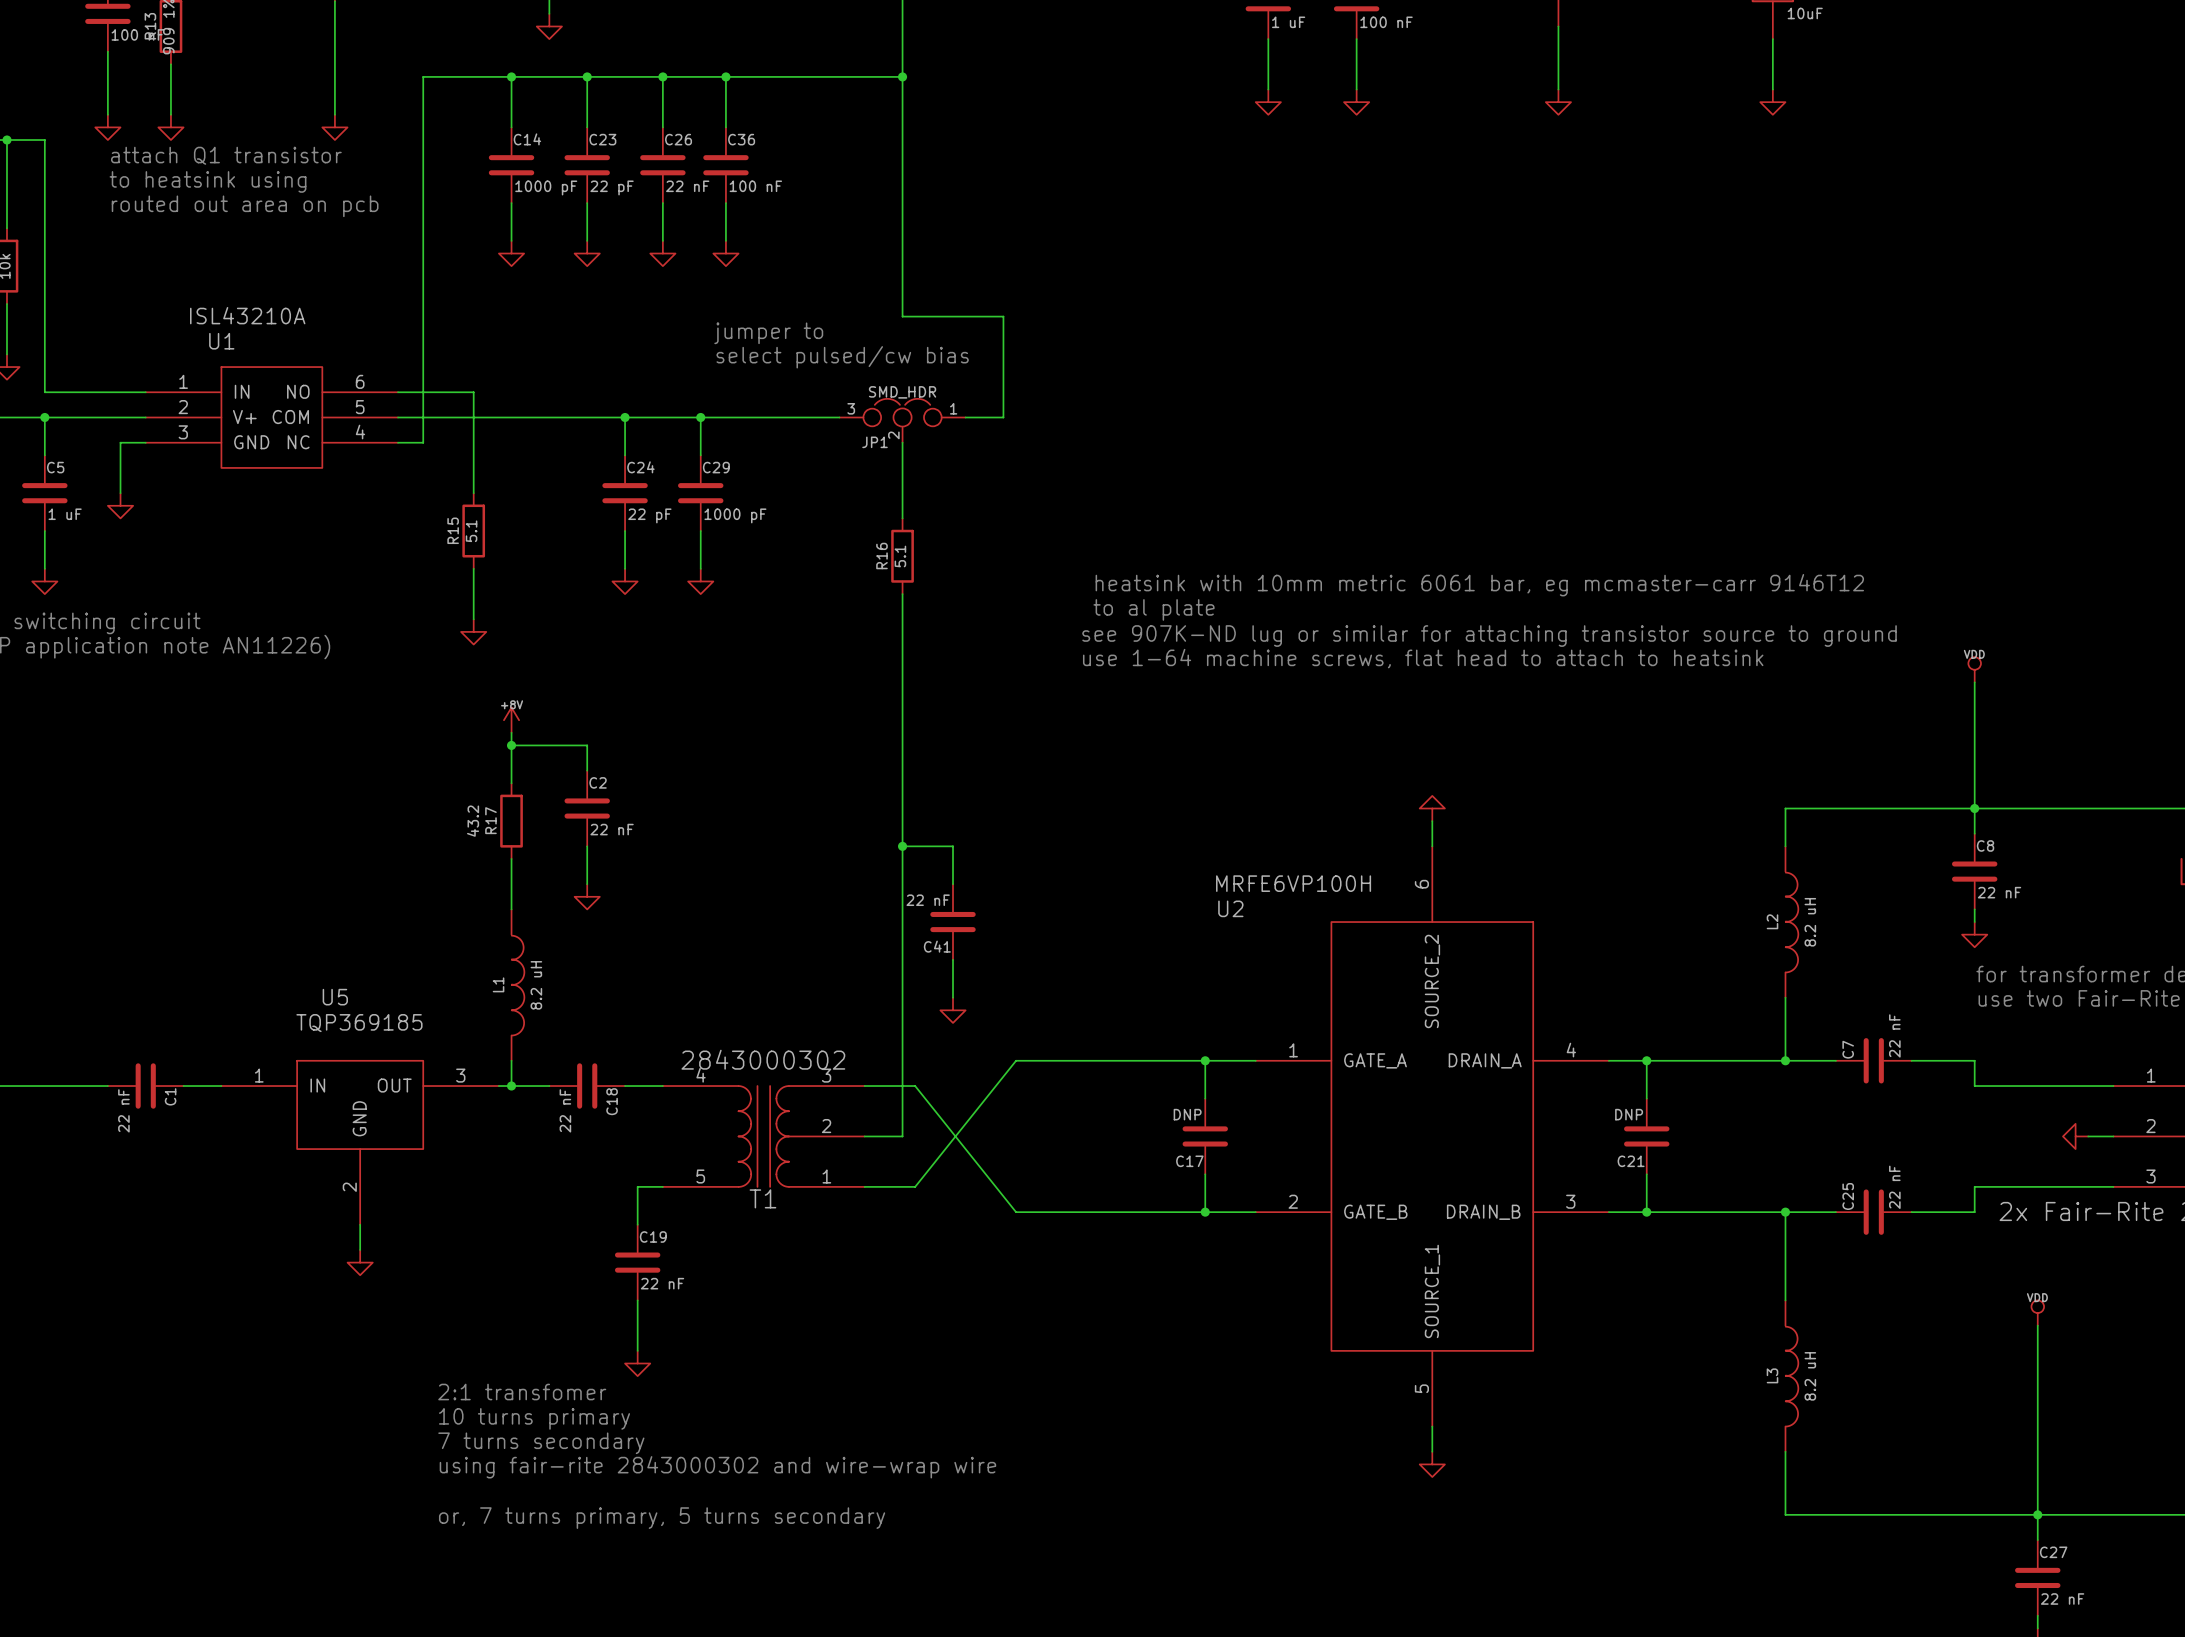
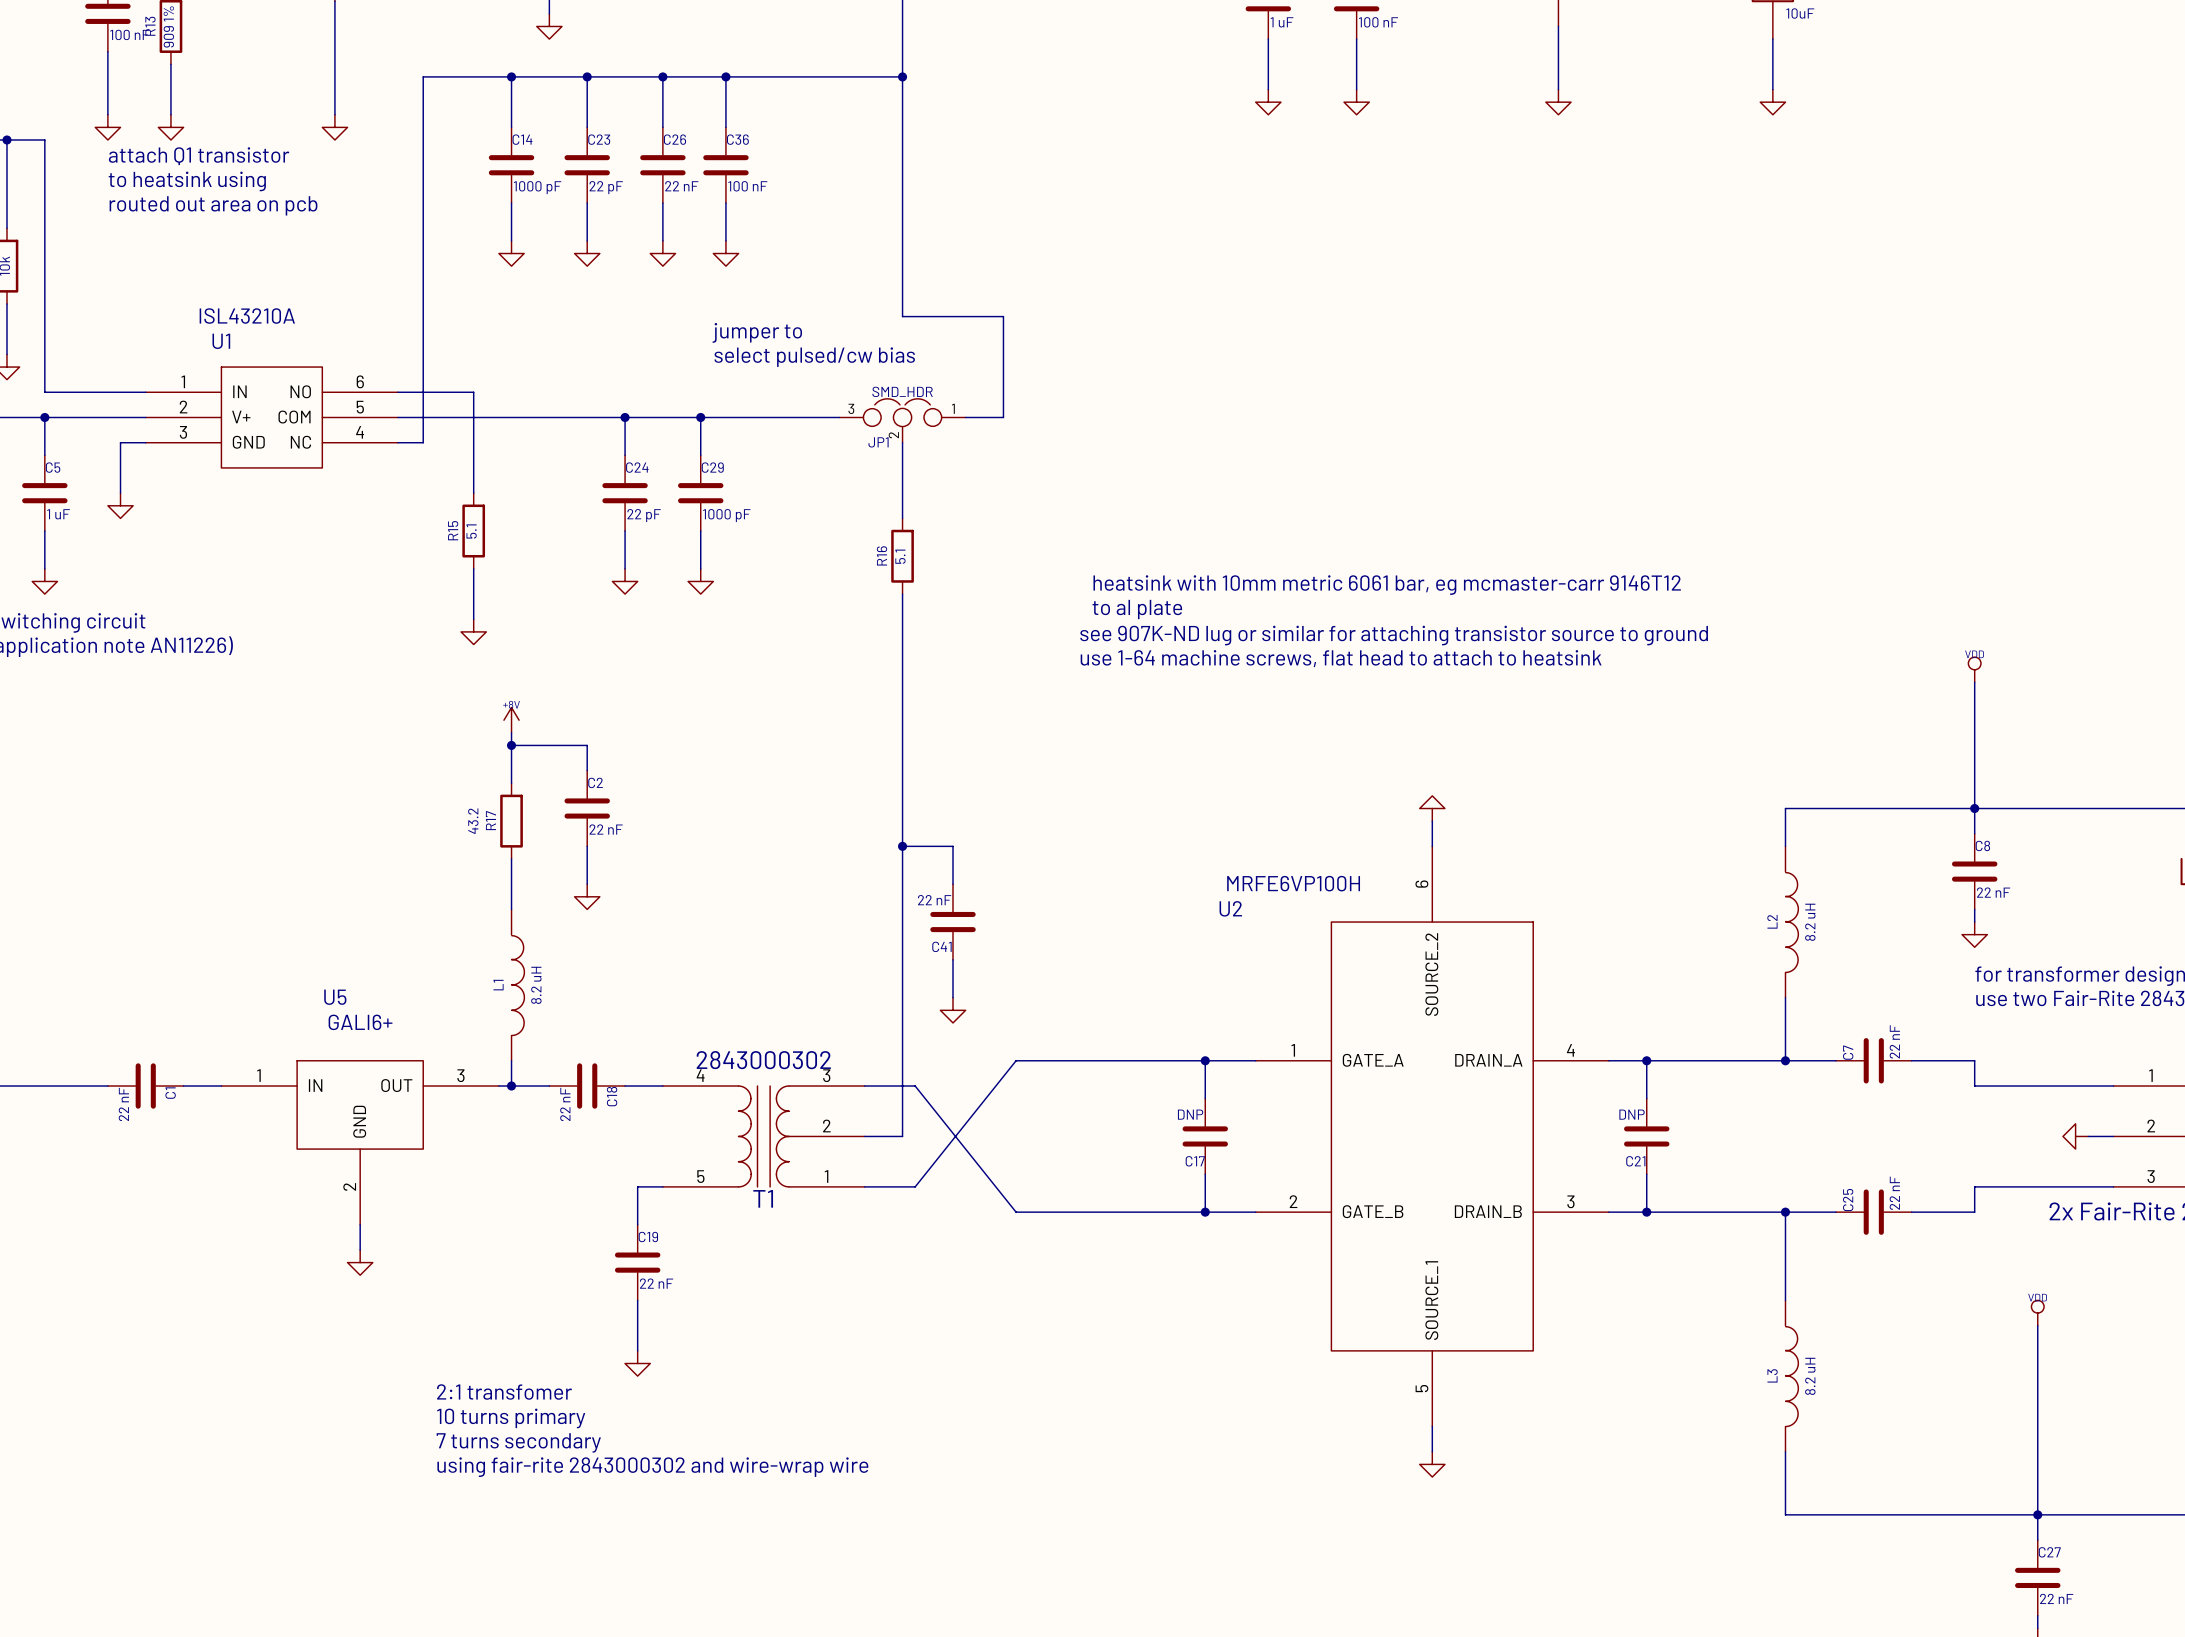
U5 value: TQP369185 (359, 1023) -> GALI6+ (360, 1022)
text: or, 7 turns primary, 5 turns secondary (662, 1518) -> none

